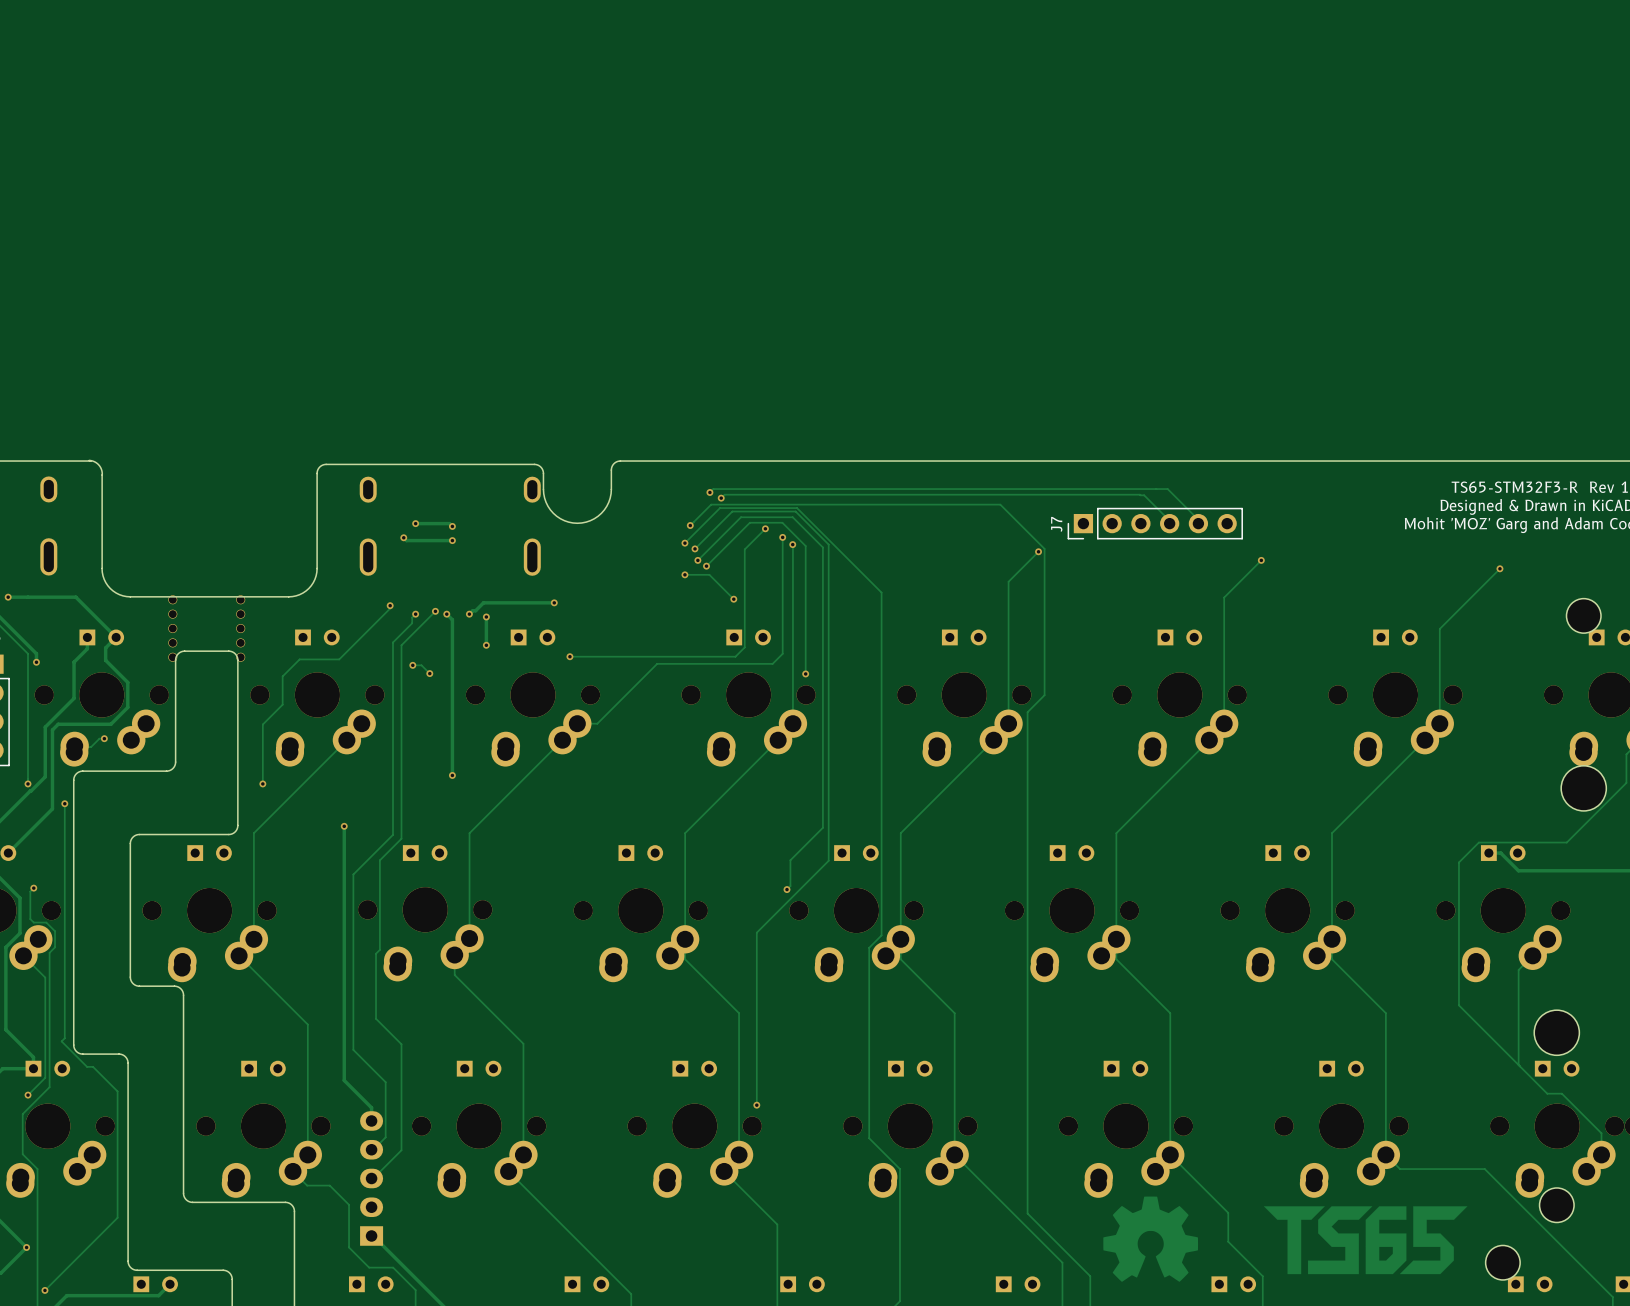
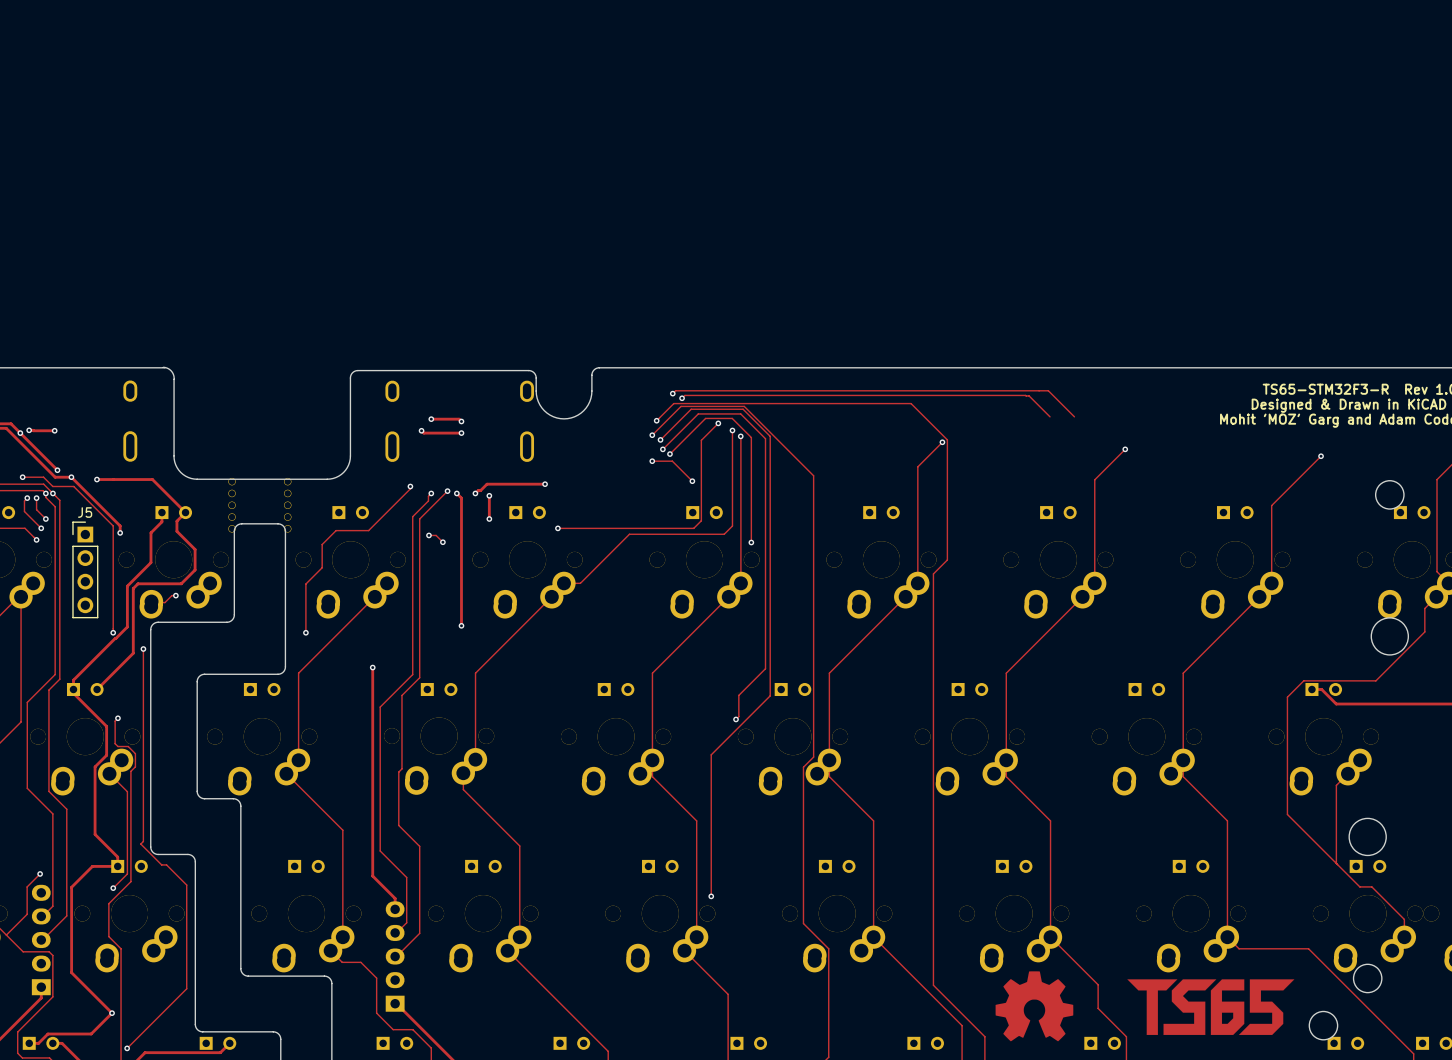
J7: (1155, 523) -> none

